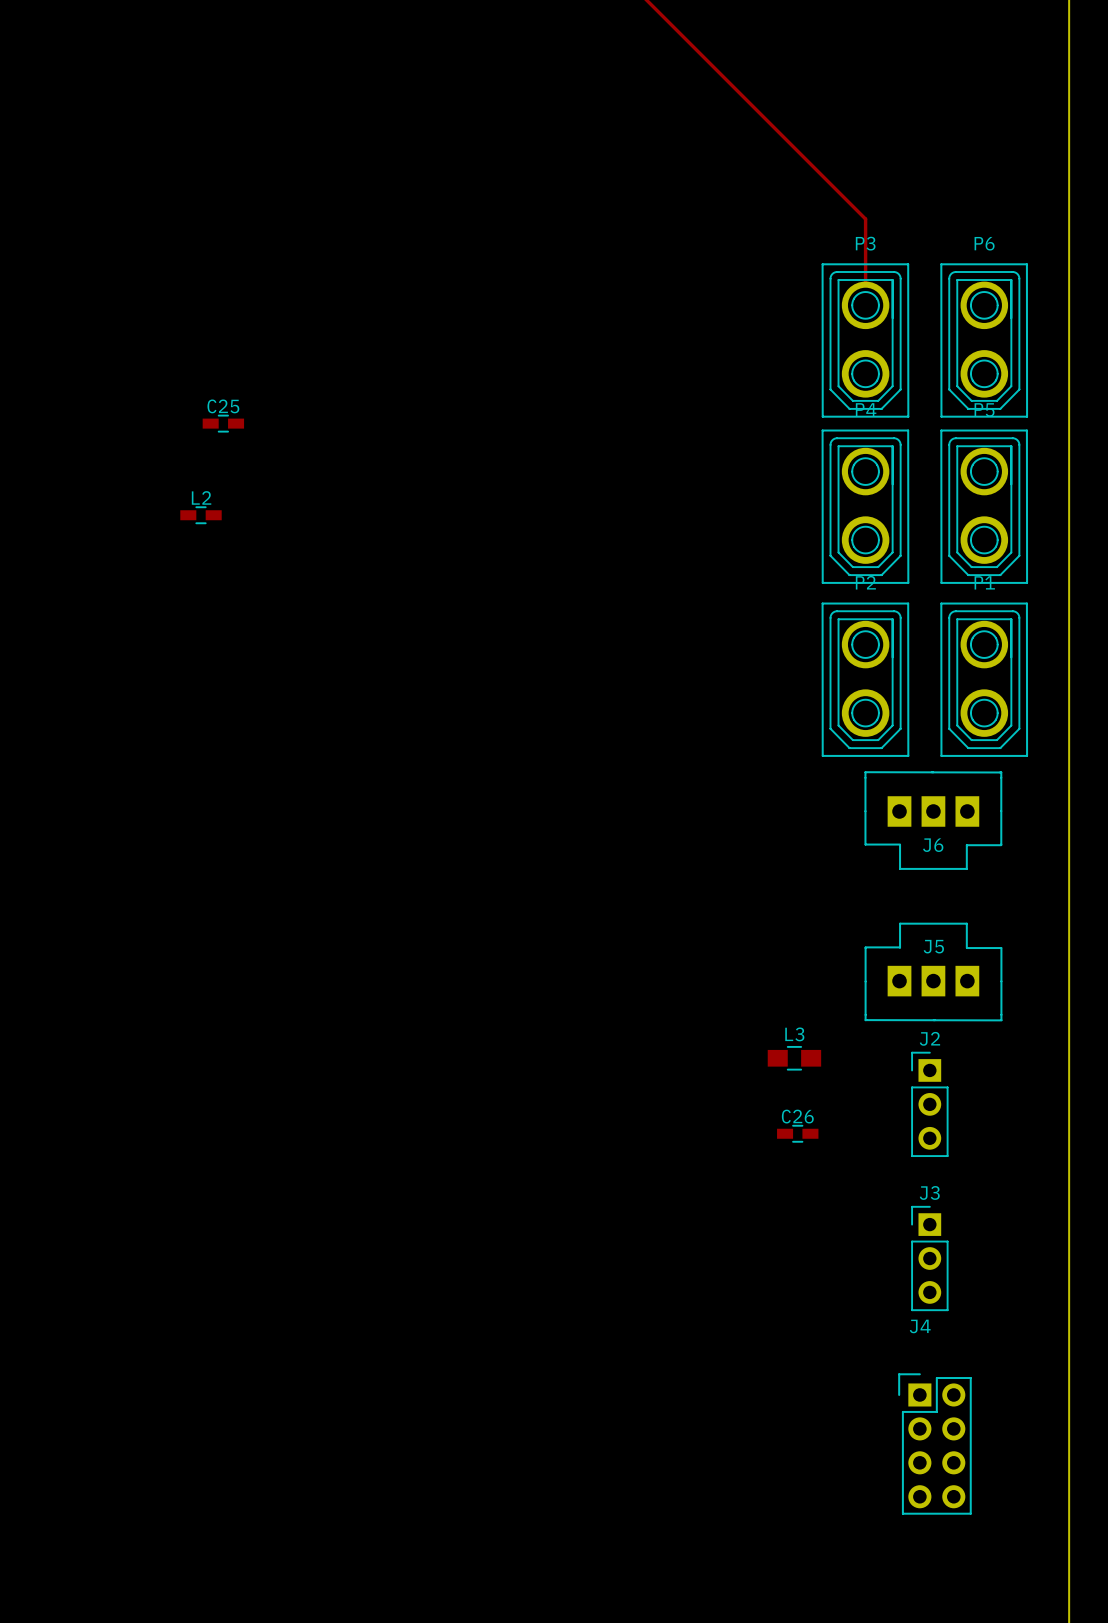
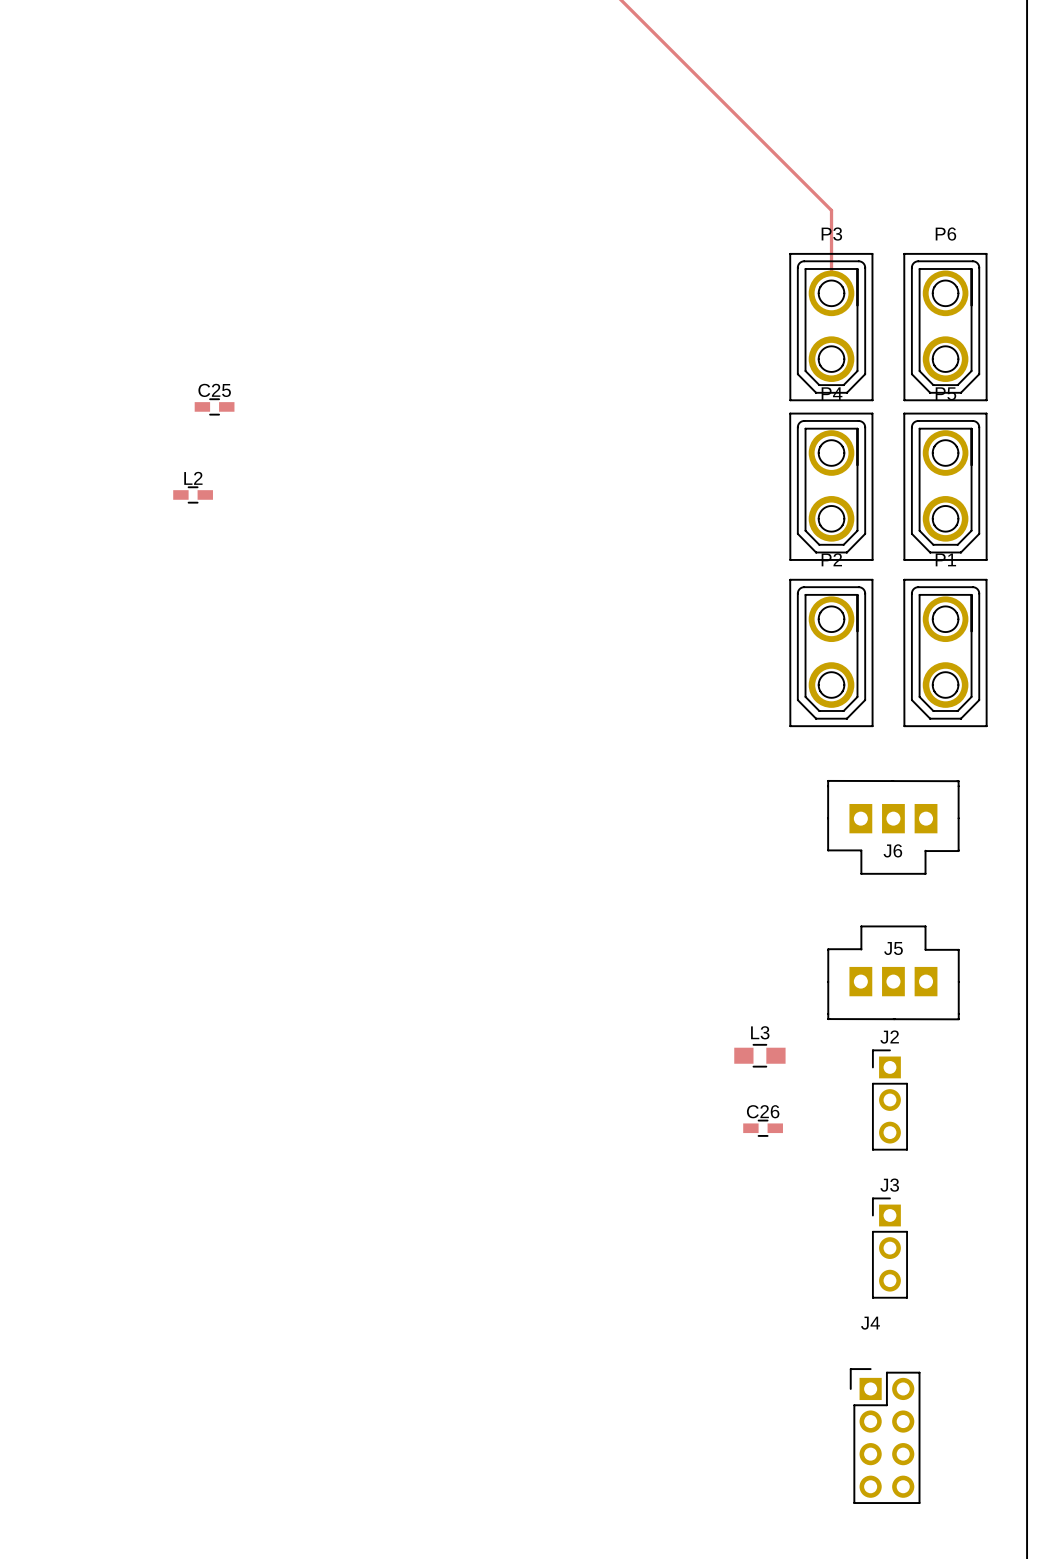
J6 position: (933, 820) -> (893, 827)
J5 position: (933, 972) -> (893, 972)
L3 position: (794, 1058) -> (759, 1055)
J2 position: (929, 1104) -> (889, 1100)
C26 position: (797, 1133) -> (763, 1128)
J3 position: (929, 1258) -> (889, 1248)
J4 position: (934, 1443) -> (885, 1436)

